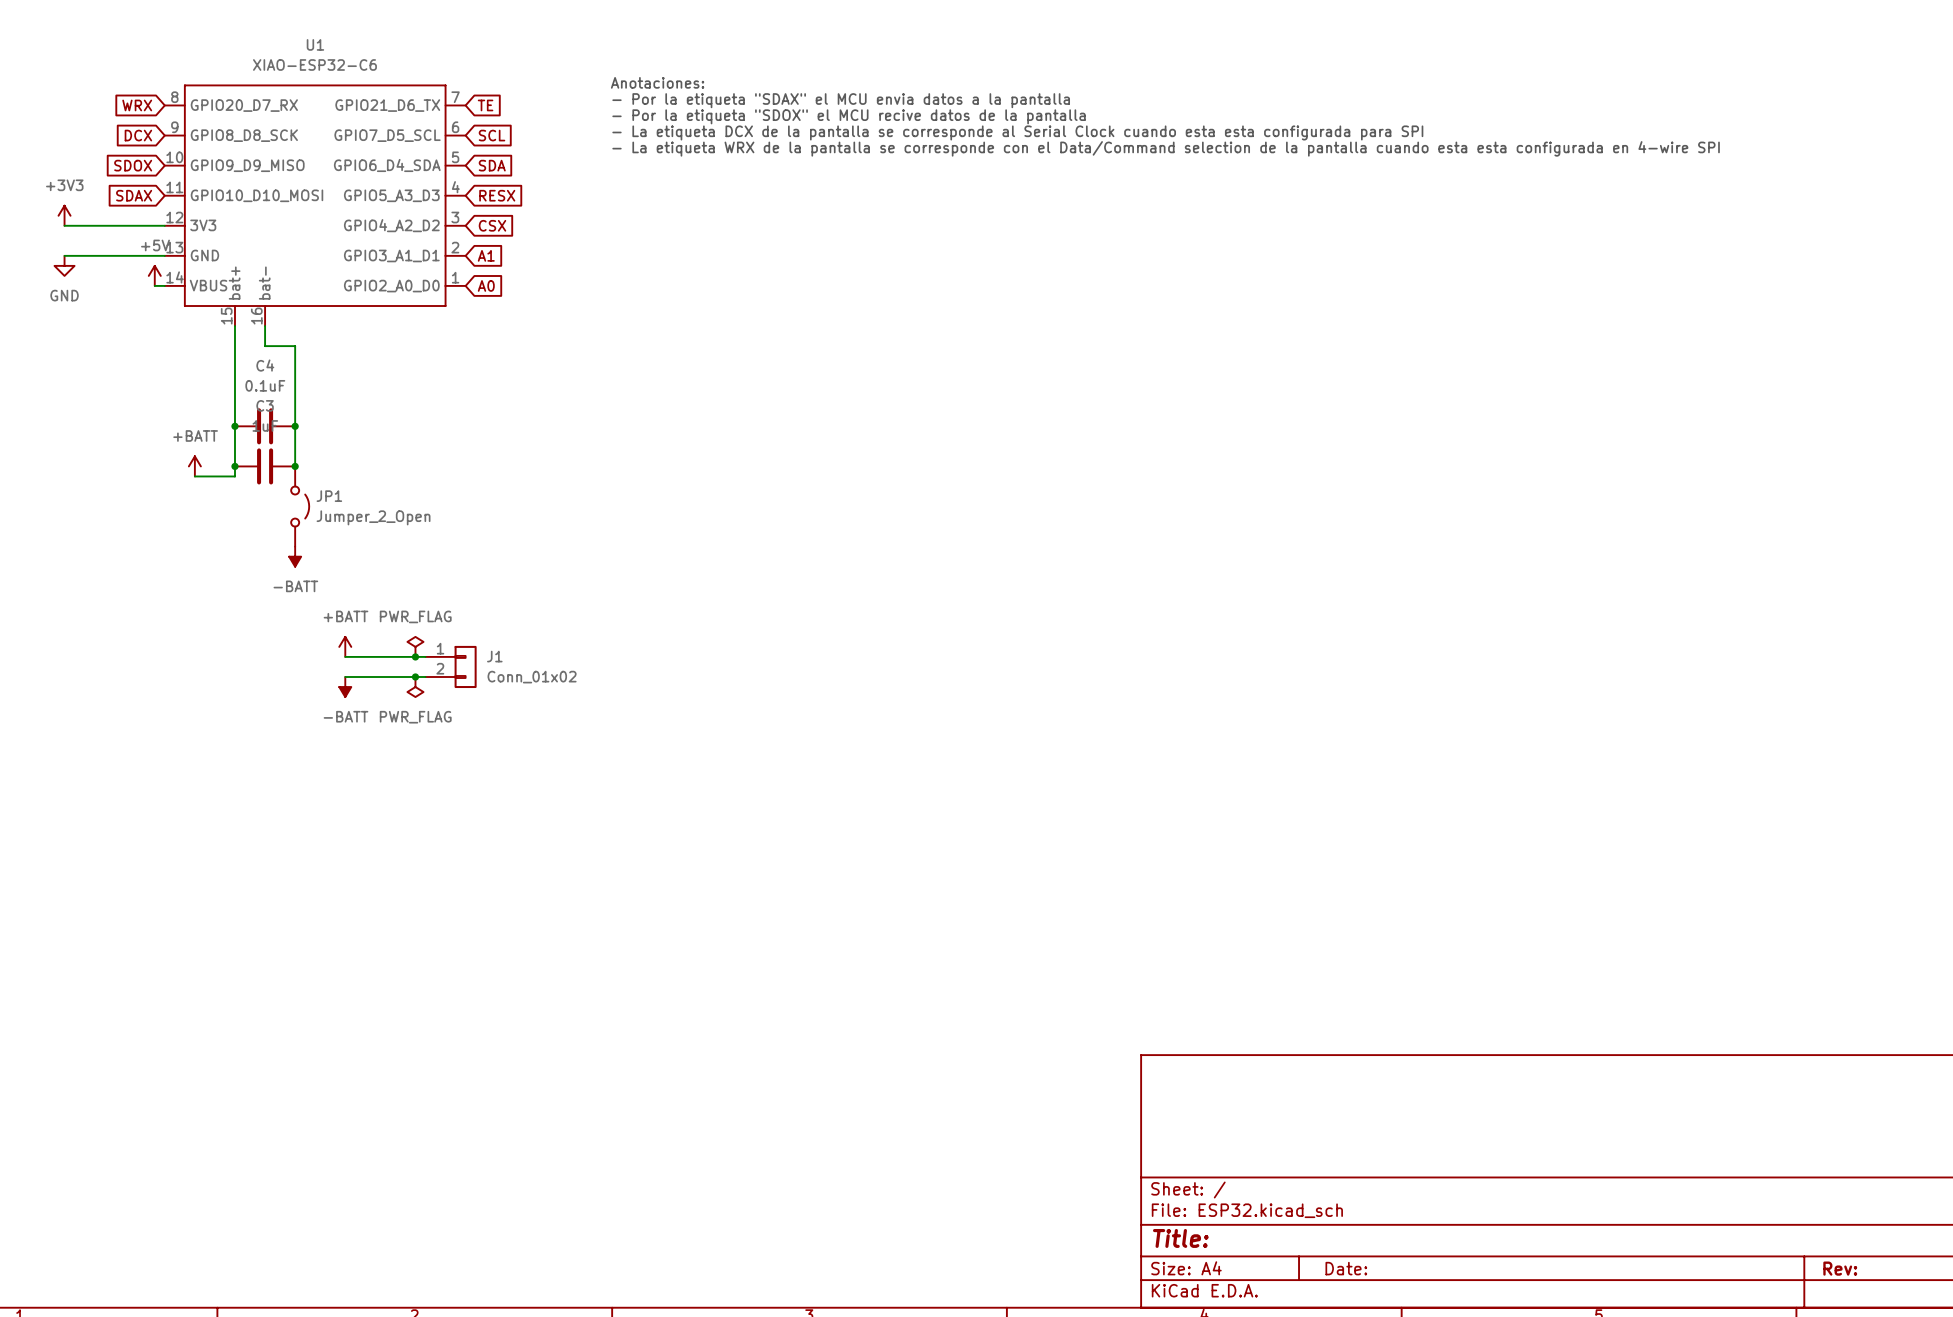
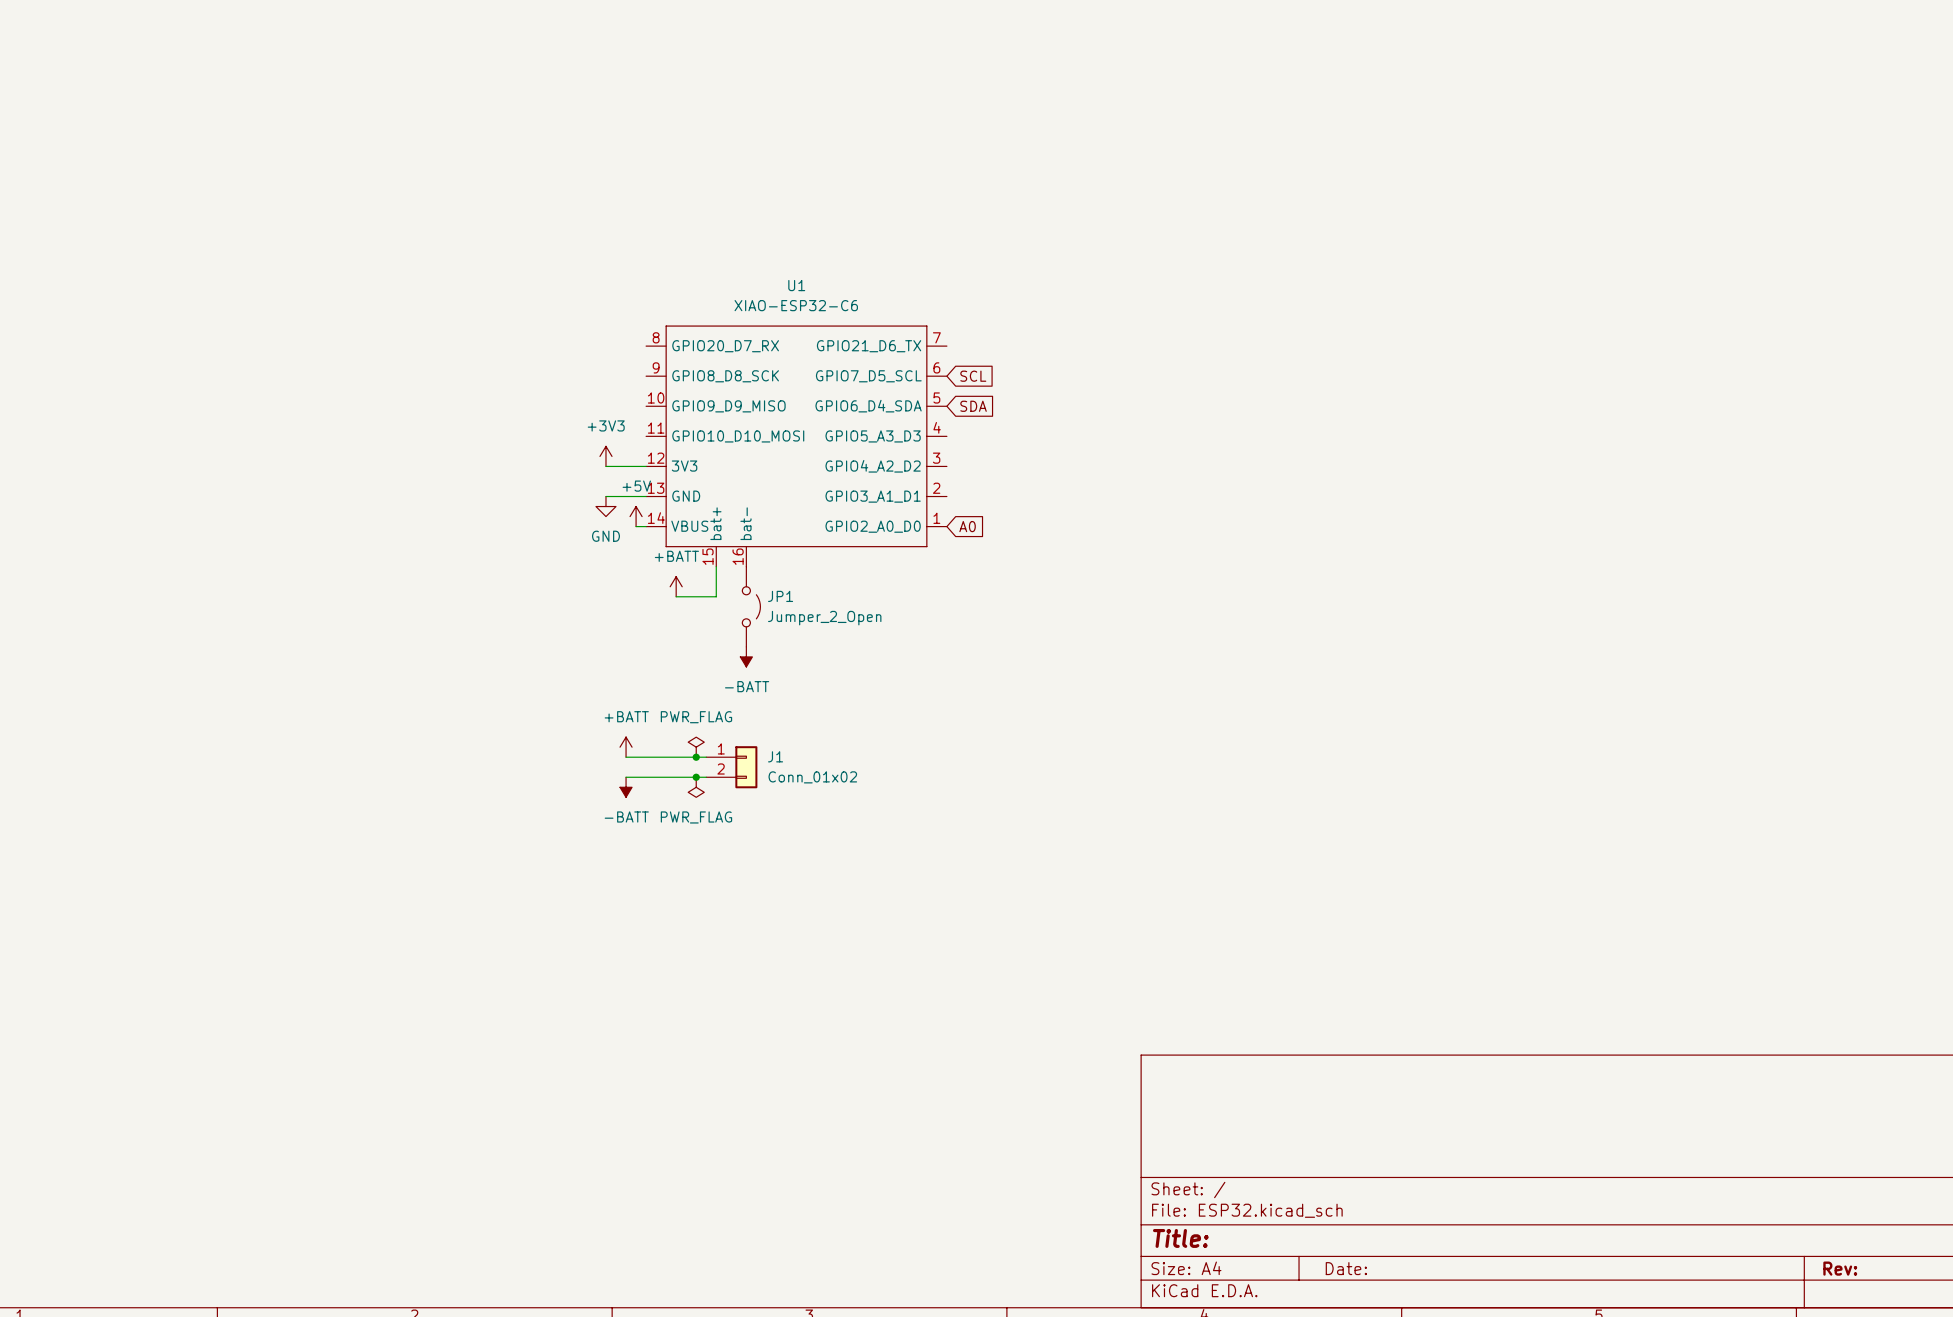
text: Anotaciones: (657, 82) -> none
text: - Por la etiqueta "SDAX" el MCU envia datos a la pantalla (841, 100) -> none
global label: WRX (137, 105) -> none
global label: TE (485, 105) -> none
text: - Por la etiqueta "SDOX" el MCU recive datos de la pantalla (849, 116) -> none
text: - La etiqueta DCX de la pantalla se corresponde al Serial Clock cuando esta esta configurada para SPI (1017, 132) -> none
global label: DCX (138, 135) -> none
global label: SCL (492, 135) -> none
text: - La etiqueta WRX de la pantalla se corresponde con el Data/Command selection de la pantalla cuando esta esta configurada en 4-wire SPI (1166, 148) -> none
global label: SDOX (133, 165) -> none
global label: SDA (492, 165) -> none
global label: SDAX (134, 195) -> none
global label: RESX (497, 195) -> none
U1 position: (315, 205) -> (796, 446)
power symbol: +3V3 (64, 215) -> none
wire: (64, 225) (164, 225) -> none
global label: CSX (492, 225) -> none
wire: (64, 255) (164, 255) -> none
global label: A1 (486, 255) -> none
power symbol: GND (64, 265) -> none
power symbol: +5V (154, 275) -> none
wire: (154, 285) (164, 285) -> none
global label: A0 (486, 285) -> none
wire: (234, 326) (234, 476) (194, 476) -> none
wire: (265, 326) (265, 346) (295, 346) (295, 466) -> none
global label: none -> SCL (973, 376)
global label: none -> SDA (973, 406)
junction: (234, 426) -> none
C4: 0.1uF (265, 426) -> none
junction: (295, 426) -> none
power symbol: none -> +3V3 (605, 456)
power symbol: +BATT (194, 466) -> none
junction: (234, 466) -> none
C3: 1uF (265, 466) -> none
junction: (295, 466) -> none
wire: none -> (605, 466) (646, 466)
wire: none -> (605, 496) (646, 496)
JP1 position: (300, 506) -> (751, 606)
power symbol: none -> GND (605, 506)
power symbol: none -> +5V (636, 516)
wire: none -> (636, 526) (646, 526)
global label: none -> A0 (967, 526)
power symbol: -BATT (295, 556) -> none
wire: none -> (716, 566) (716, 596) (676, 596)
power symbol: none -> +BATT (676, 586)
power symbol: +BATT (345, 646) -> none
power symbol: PWR_FLAG (415, 646) -> none
wire: (345, 656) (425, 656) -> none
junction: (415, 656) -> none
power symbol: none -> -BATT (746, 656)
J1 position: (451, 666) -> (731, 767)
wire: (345, 676) (425, 676) -> none
junction: (415, 676) -> none
power symbol: -BATT (345, 687) -> none
power symbol: PWR_FLAG (415, 687) -> none
power symbol: none -> +BATT (626, 747)
power symbol: none -> PWR_FLAG (696, 747)
wire: none -> (626, 757) (706, 757)
junction: none -> (696, 757)
wire: none -> (626, 777) (706, 777)
junction: none -> (696, 777)
power symbol: none -> -BATT (626, 787)
power symbol: none -> PWR_FLAG (696, 787)

